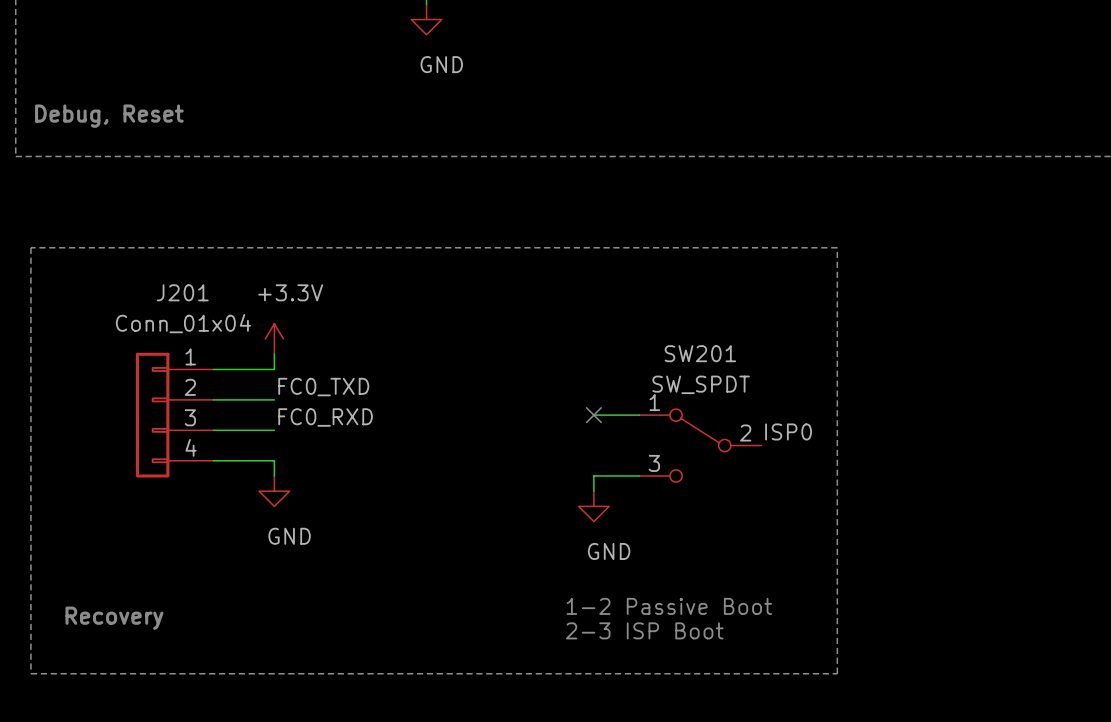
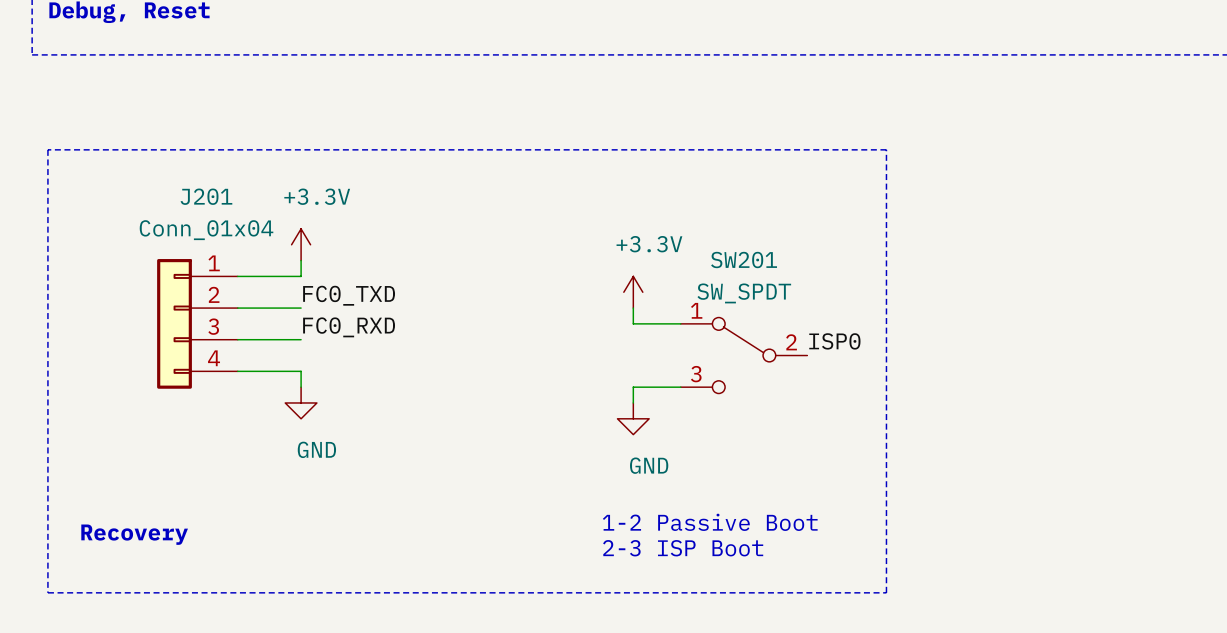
power symbol: none -> +3.3V (633, 292)
wire: none -> (633, 308) (633, 323)
no-connect mark: (593, 415) -> none

